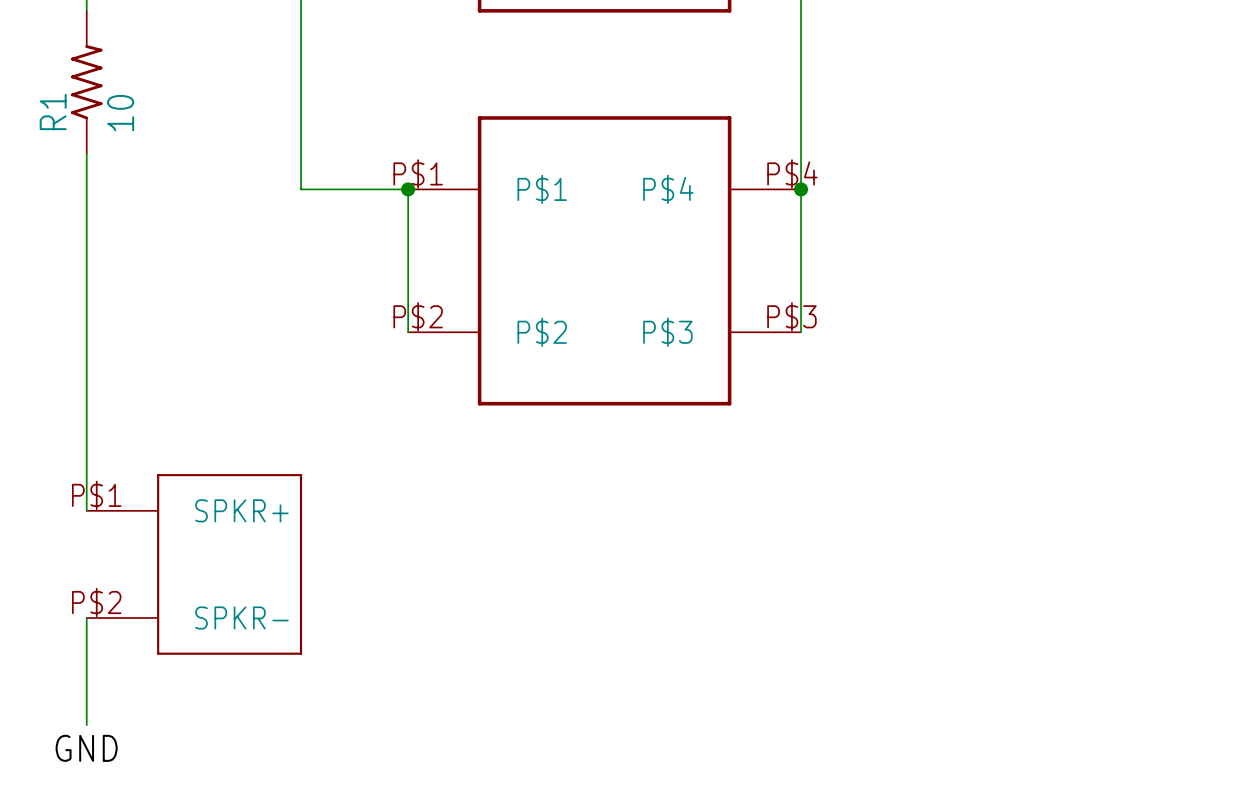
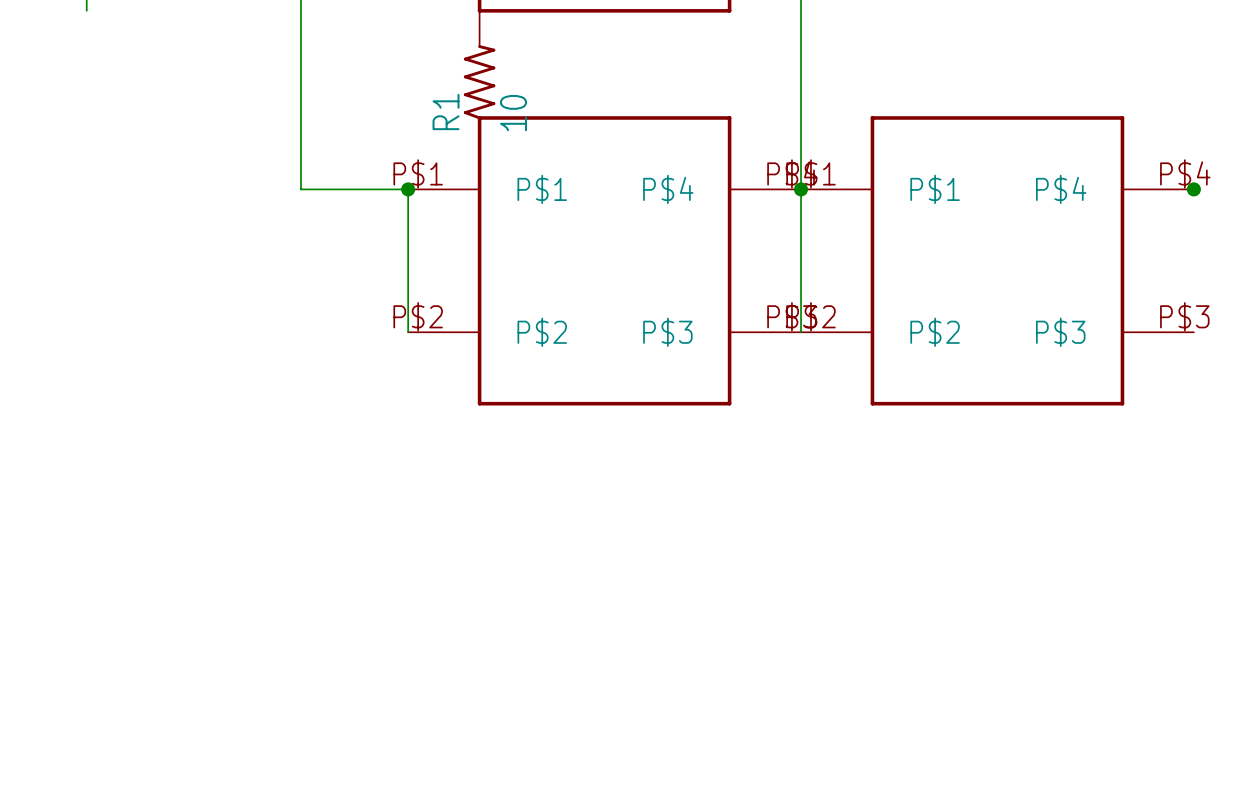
R1 position: (86, 82) -> (479, 82)
wire: (86, 153) (86, 510) -> none
junction: none -> (1193, 189)
part: none -> (997, 260)
part: (194, 564) -> none
wire: (86, 617) (86, 725) -> none
label: GND (86, 748) -> none

